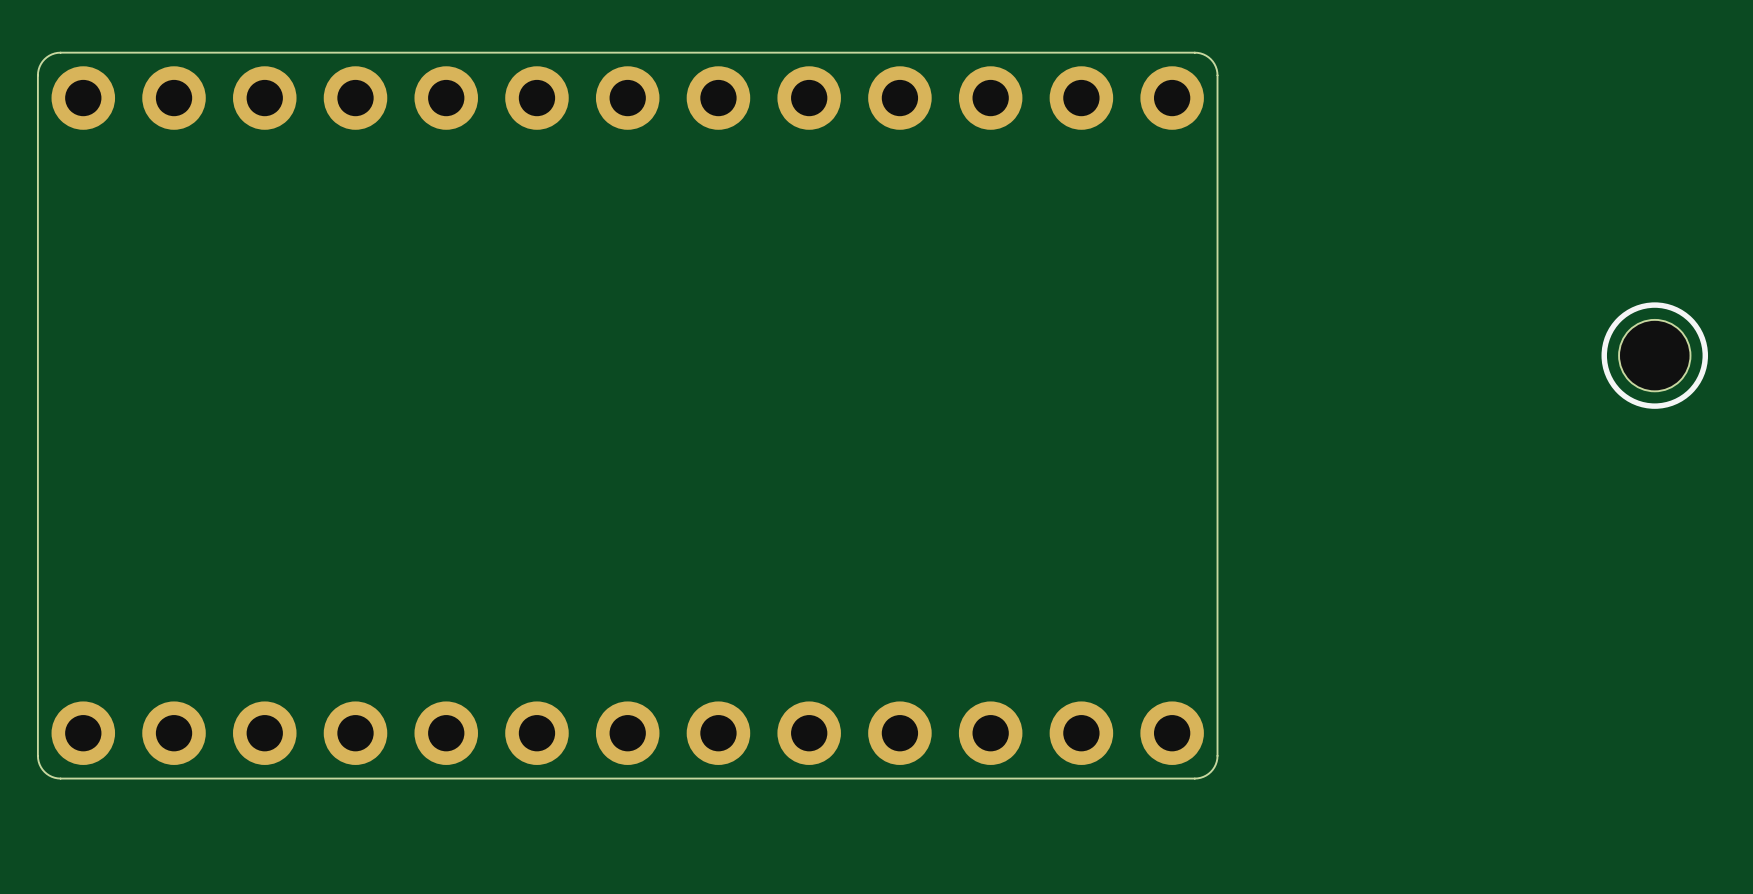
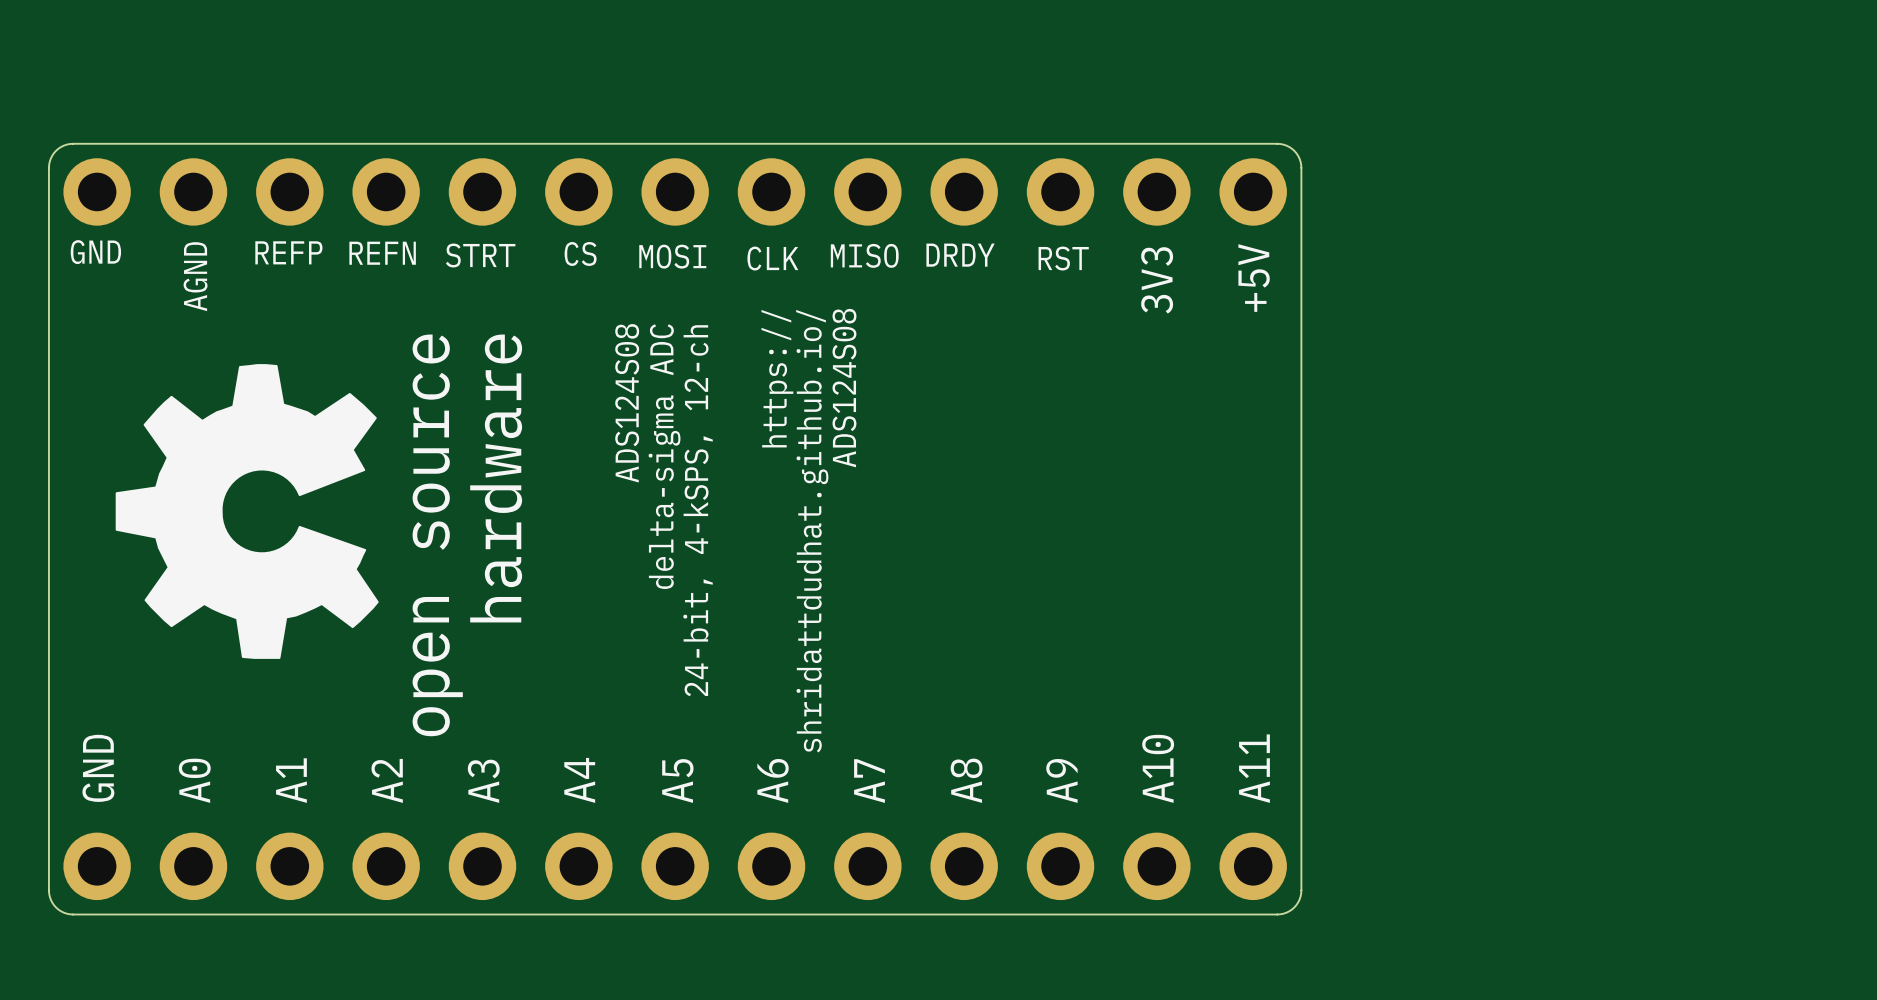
text: none -> GND (95, 252)
text: none -> REFP (288, 252)
text: none -> REFN (382, 253)
text: none -> CS (580, 253)
text: none -> STRT (480, 255)
text: none -> DRDY (960, 255)
text: none -> MOSI (672, 256)
text: none -> MISO (864, 255)
text: none -> CLK (772, 258)
text: none -> RST (1063, 258)
text: none -> AGND (195, 276)
text: none -> +5V (1254, 278)
text: none -> 3V3 (1157, 280)
drawing: none -> [115, 364, 379, 659]
text: none -> https:// (777, 378)
text: none -> ADS124S08 (844, 388)
text: none -> ADS124S08 (627, 403)
drawing: [1601, 302, 1709, 409] -> none
text: none -> delta-sigma ADC (664, 456)
hole: (1654, 355) -> none
text: none -> 24-bit, 4-kSPS, 12-ch (698, 510)
text: none -> shridattdudhat.github.io/ (812, 531)
text: none -> GND (98, 768)
text: none -> A10 (1158, 768)
text: none -> A11 (1254, 768)
text: none -> A0 (194, 780)
text: none -> A1 (291, 780)
text: none -> A2 (387, 780)
text: none -> A4 (579, 780)
text: none -> A5 (677, 781)
text: none -> A6 (773, 780)
text: none -> A7 (869, 781)
text: none -> A8 (966, 780)
text: none -> A9 (1061, 780)
text: none -> A3 (483, 781)

